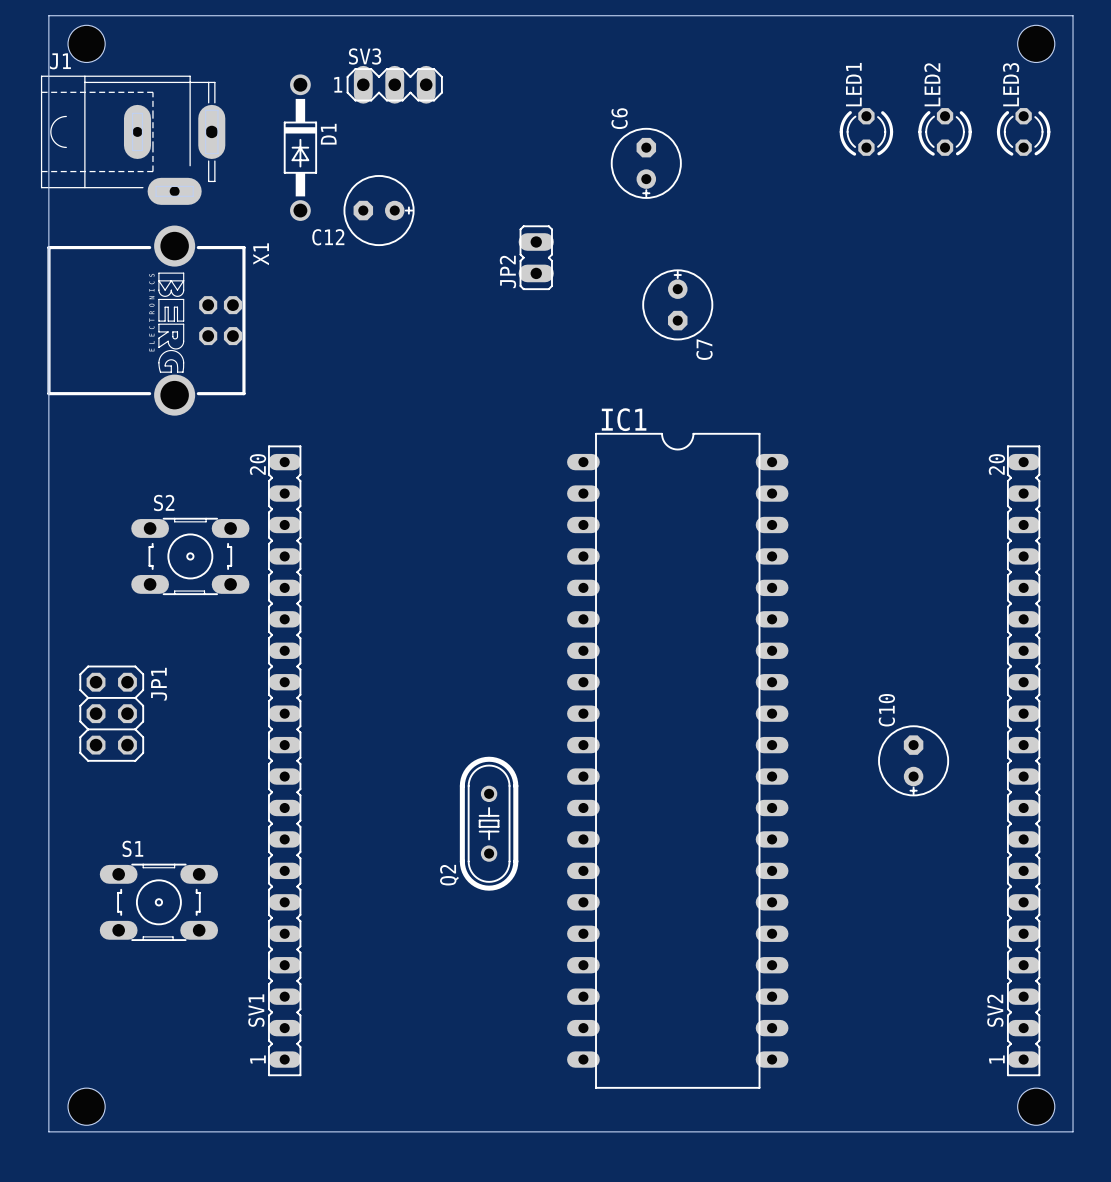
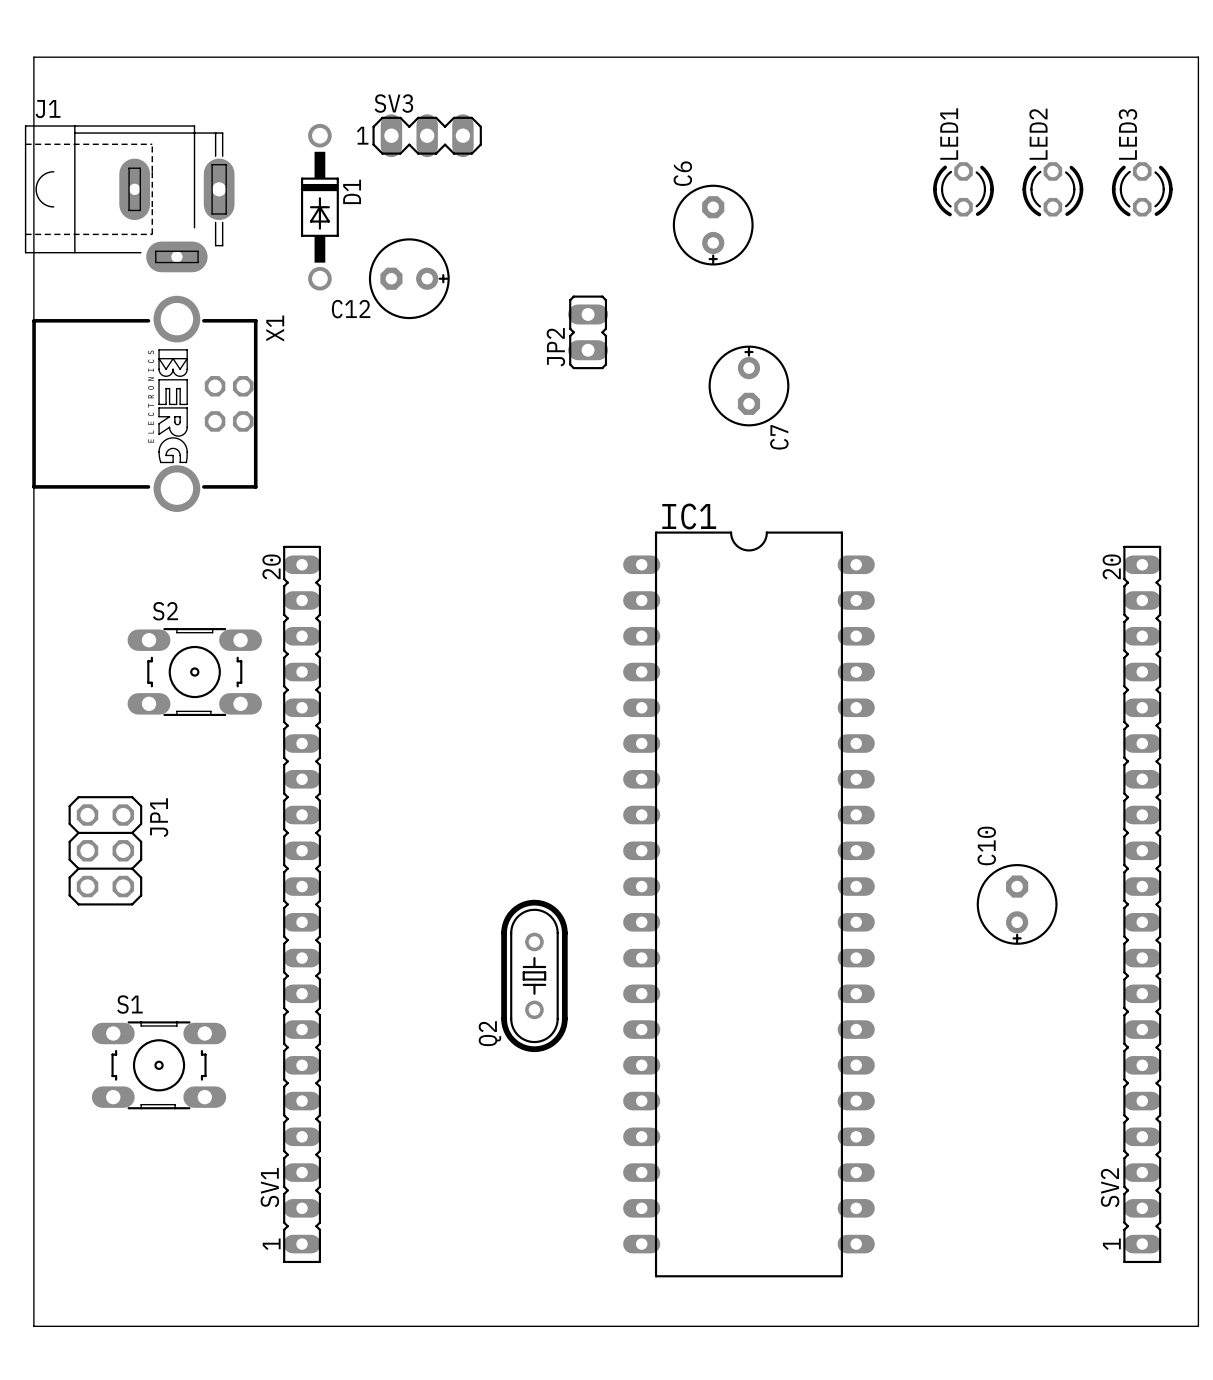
hole: (86, 43) -> none
hole: (1036, 43) -> none
hole: (86, 1106) -> none
hole: (1036, 1106) -> none

